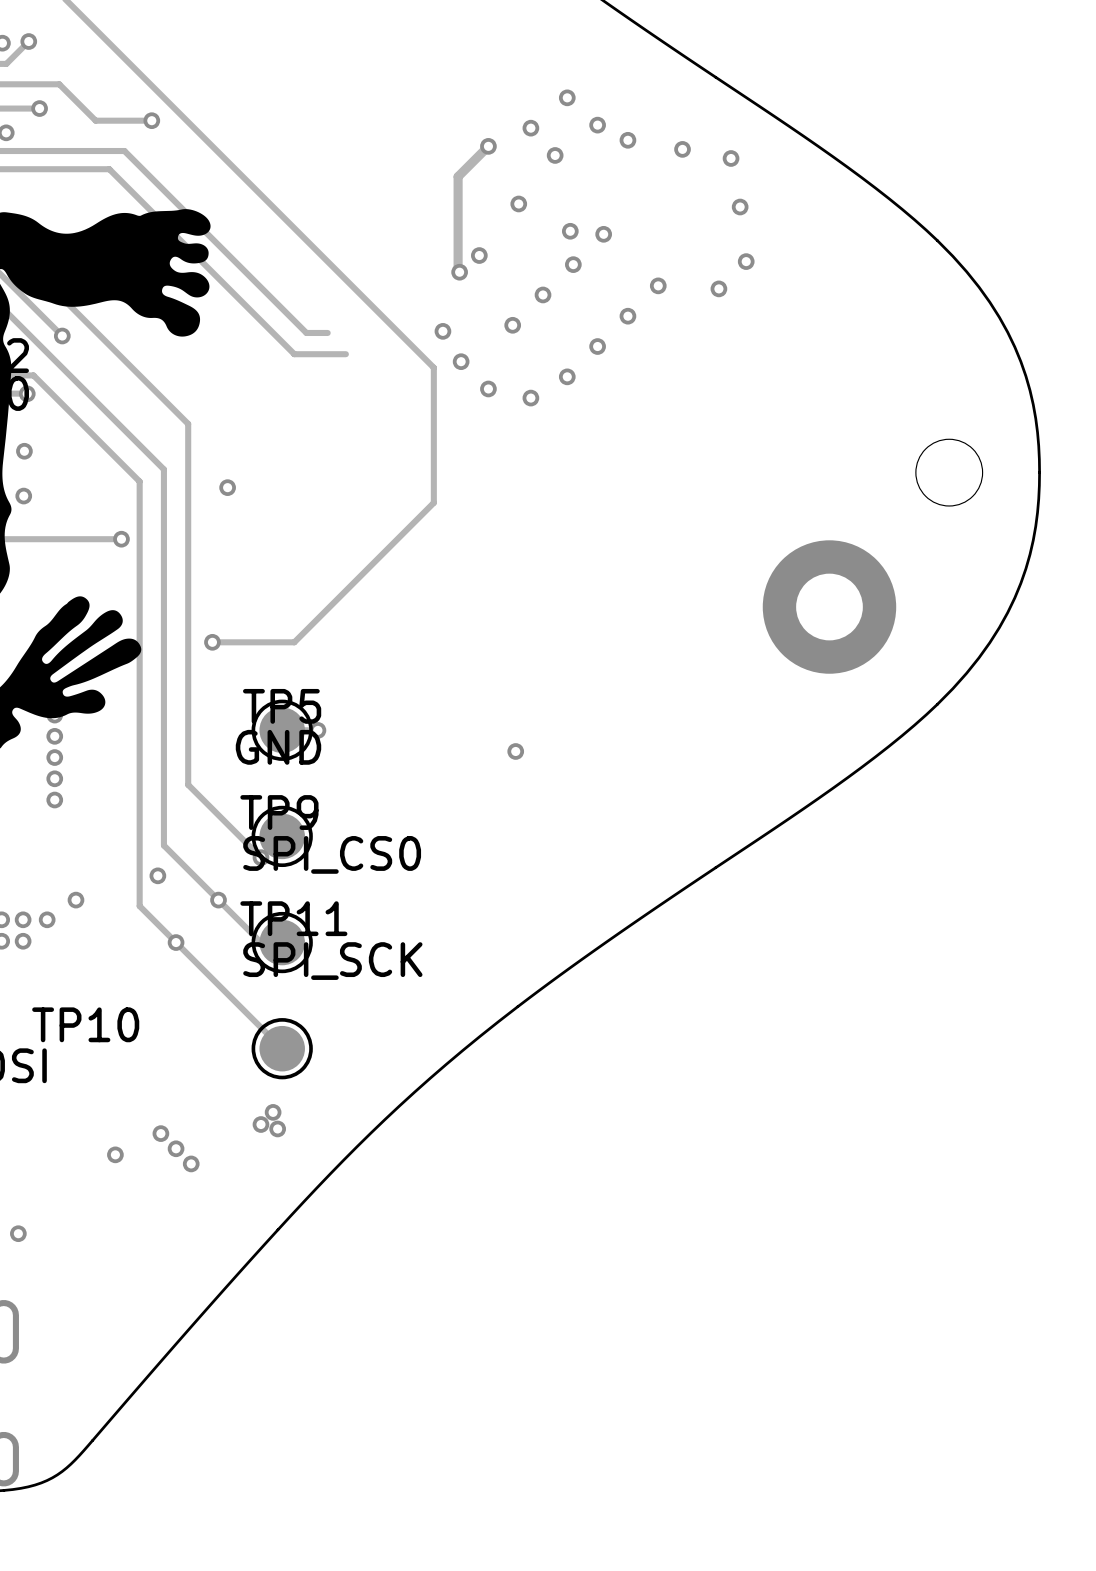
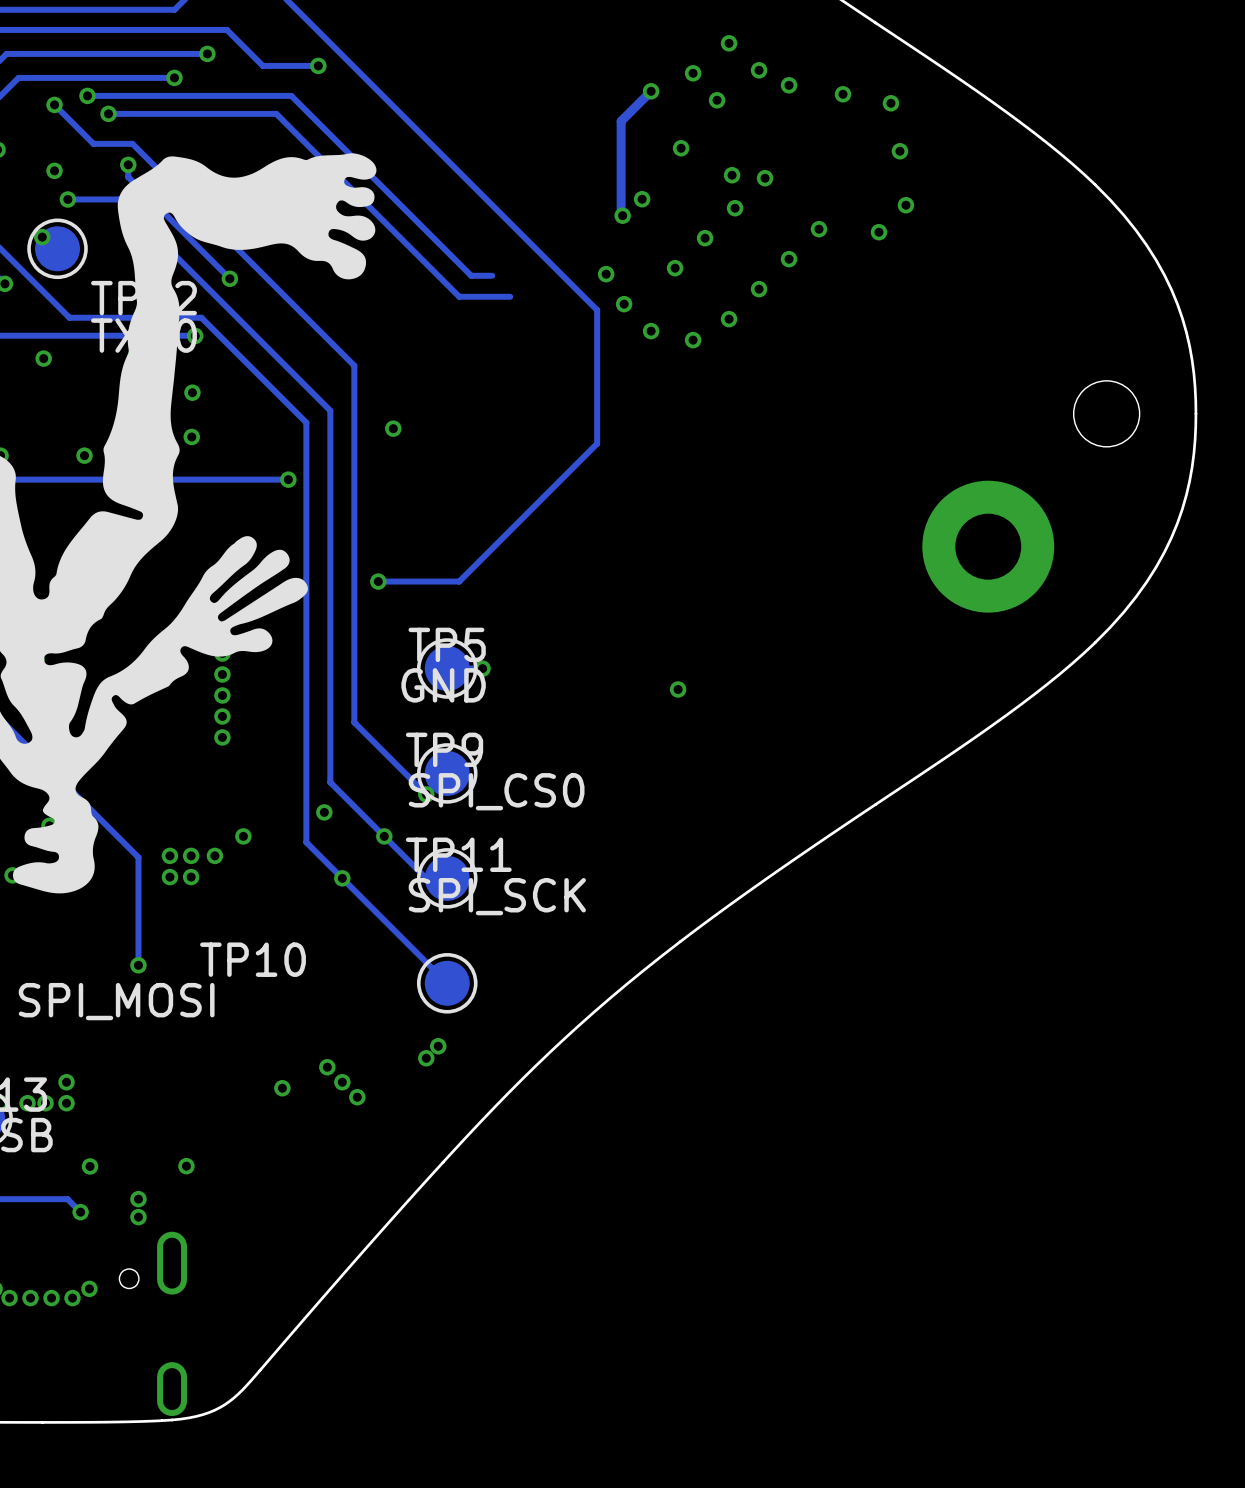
via: (277, 1128) -> none

